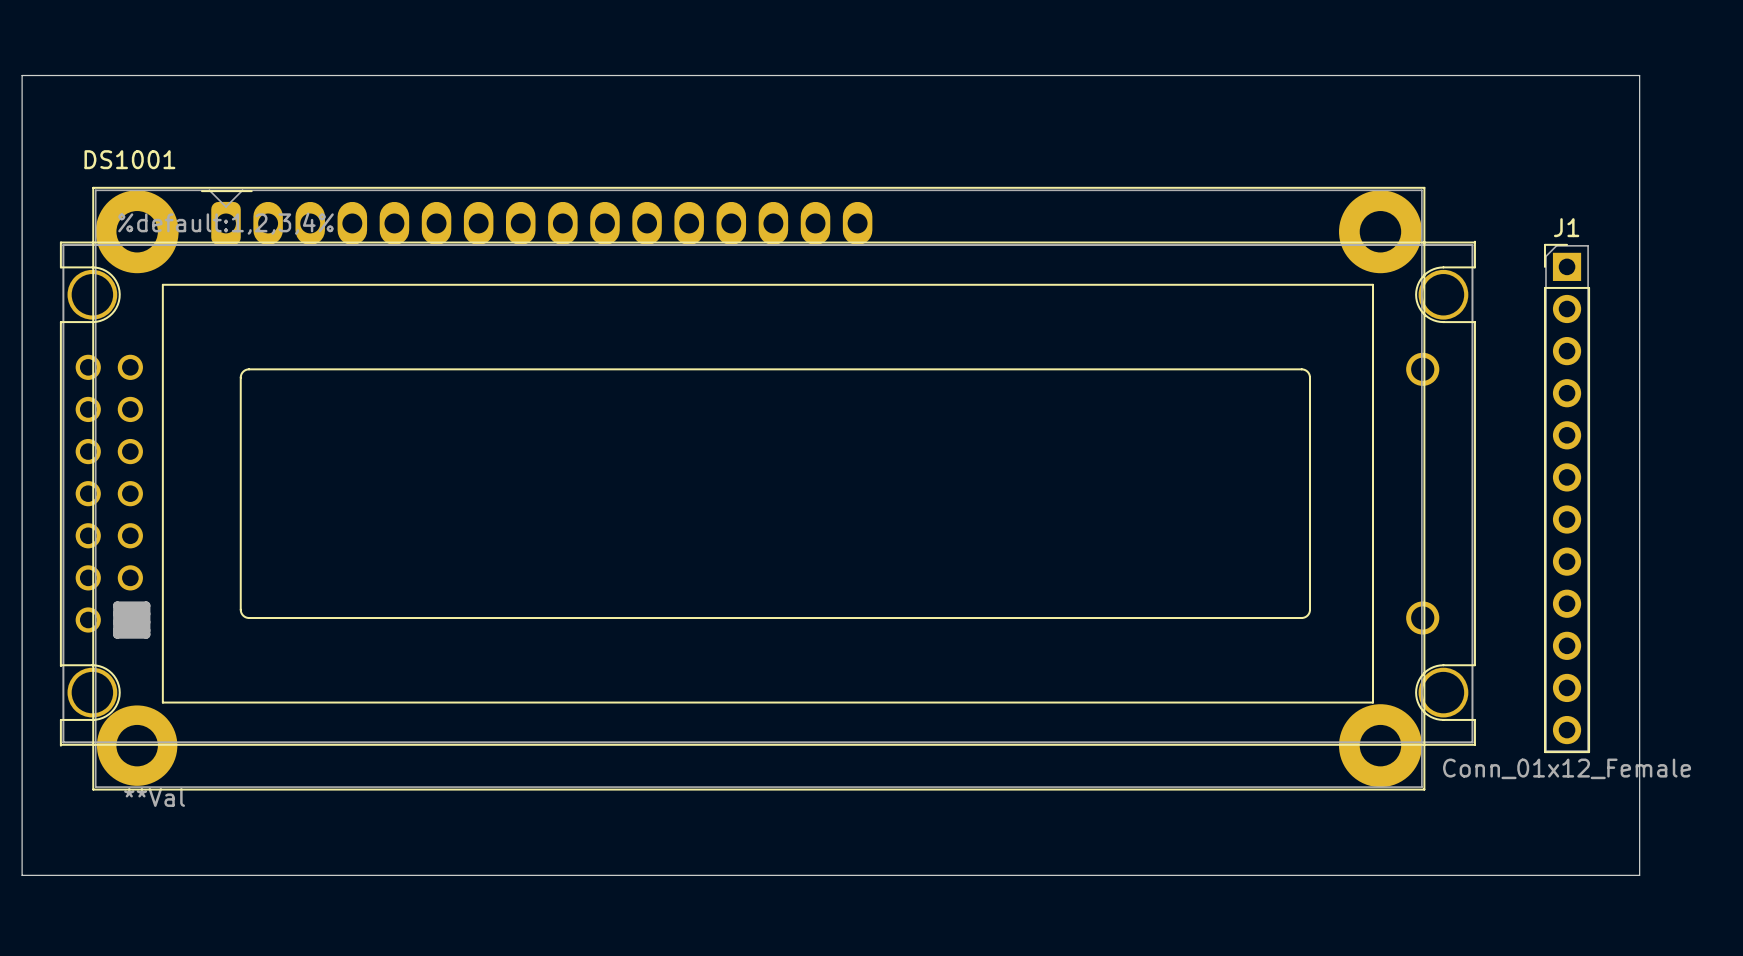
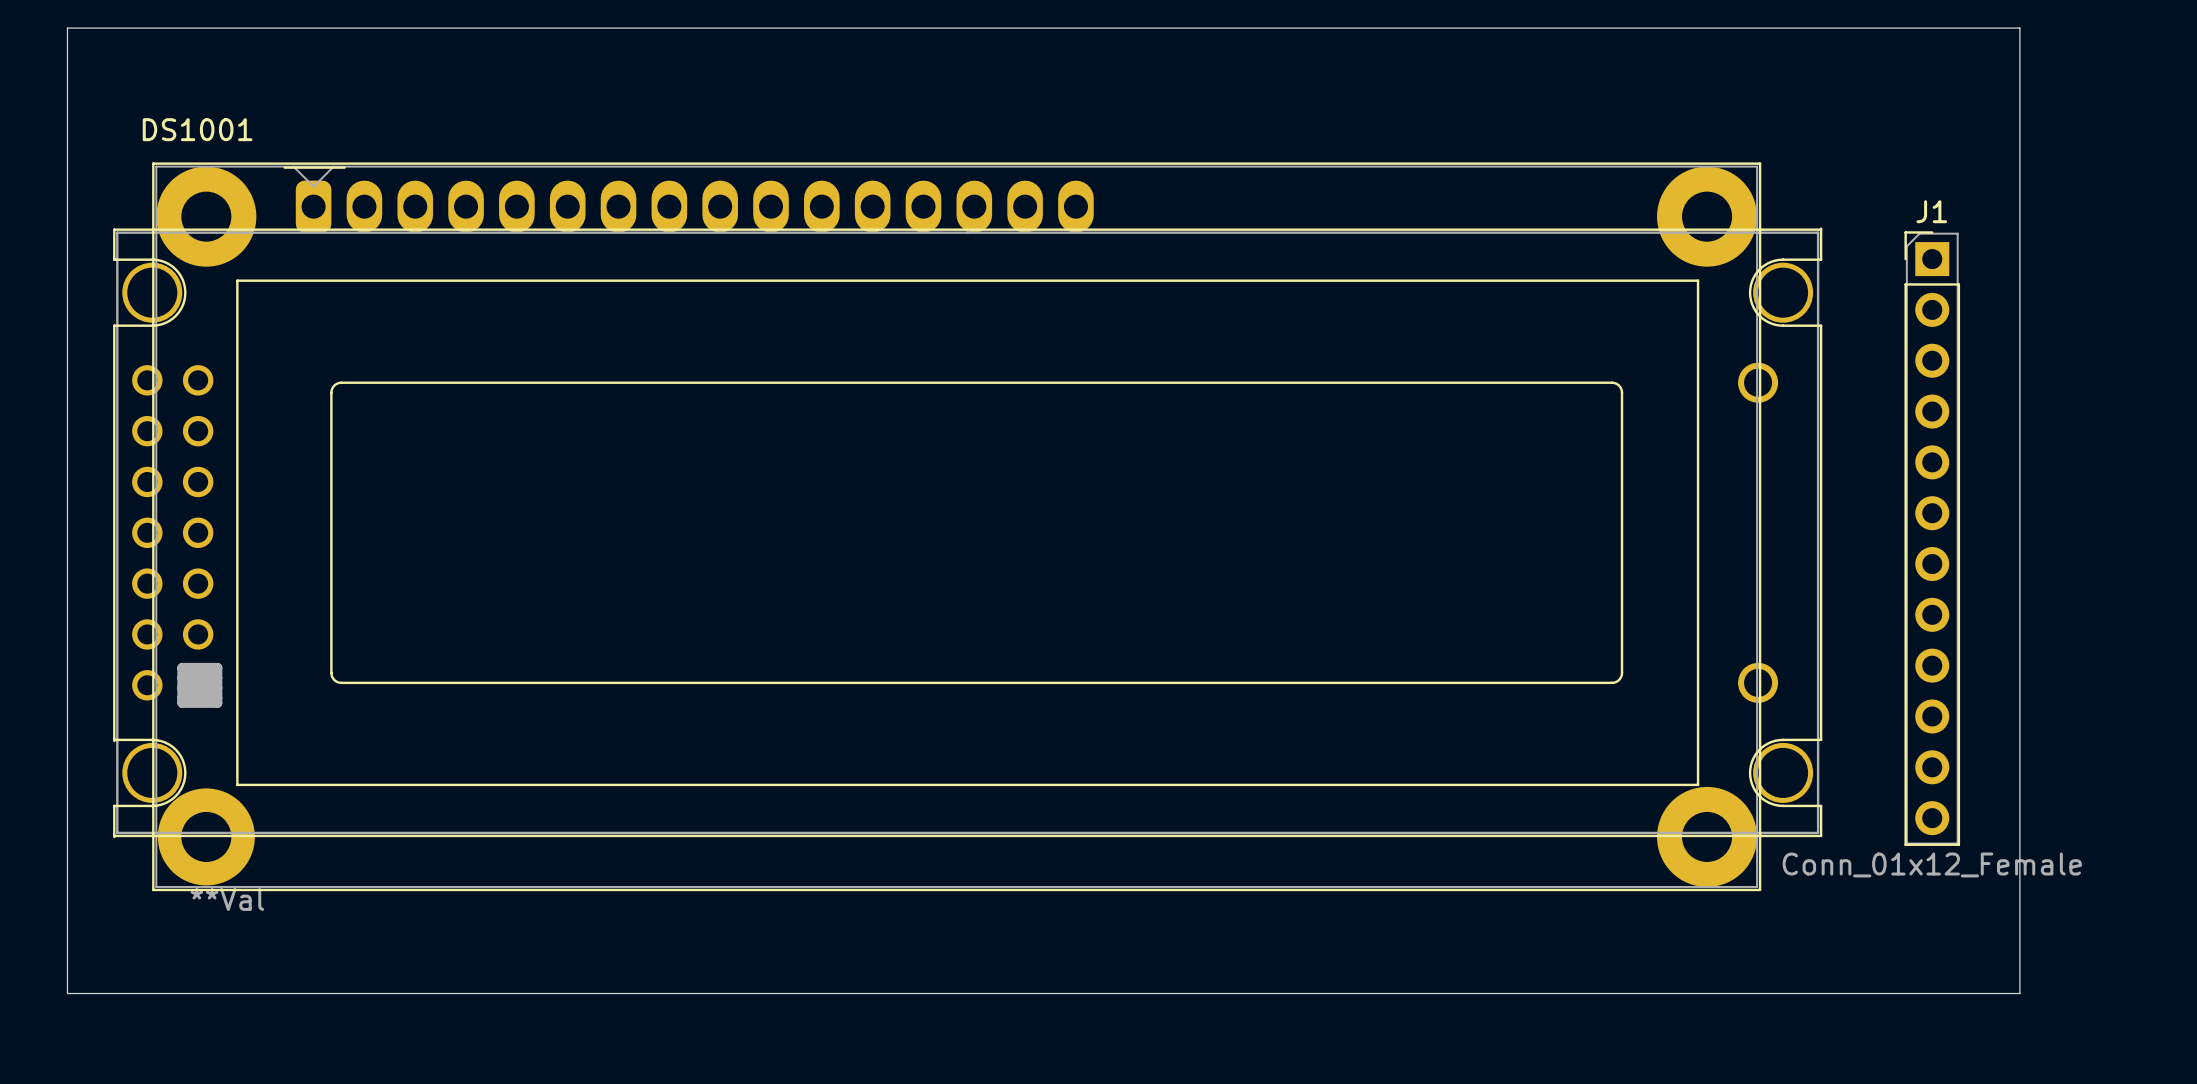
DS1001 footprint: [59, 186, 1476, 791] -> [113, 162, 1823, 892]

